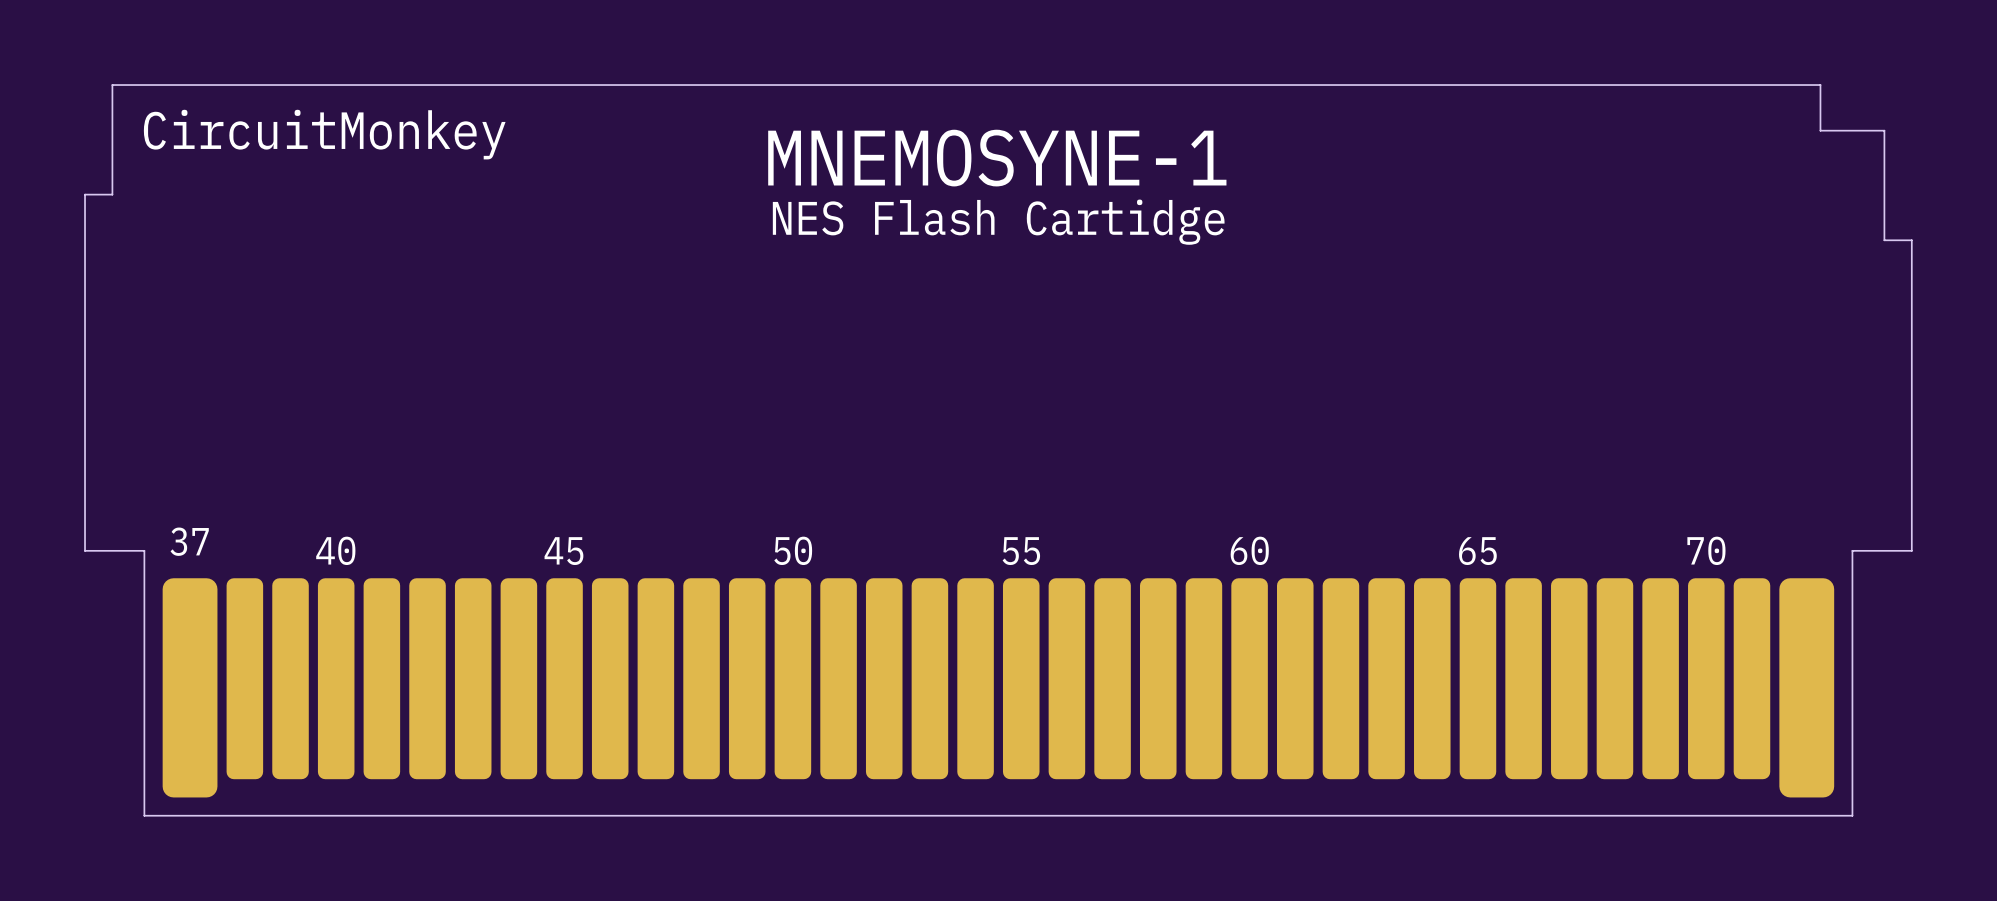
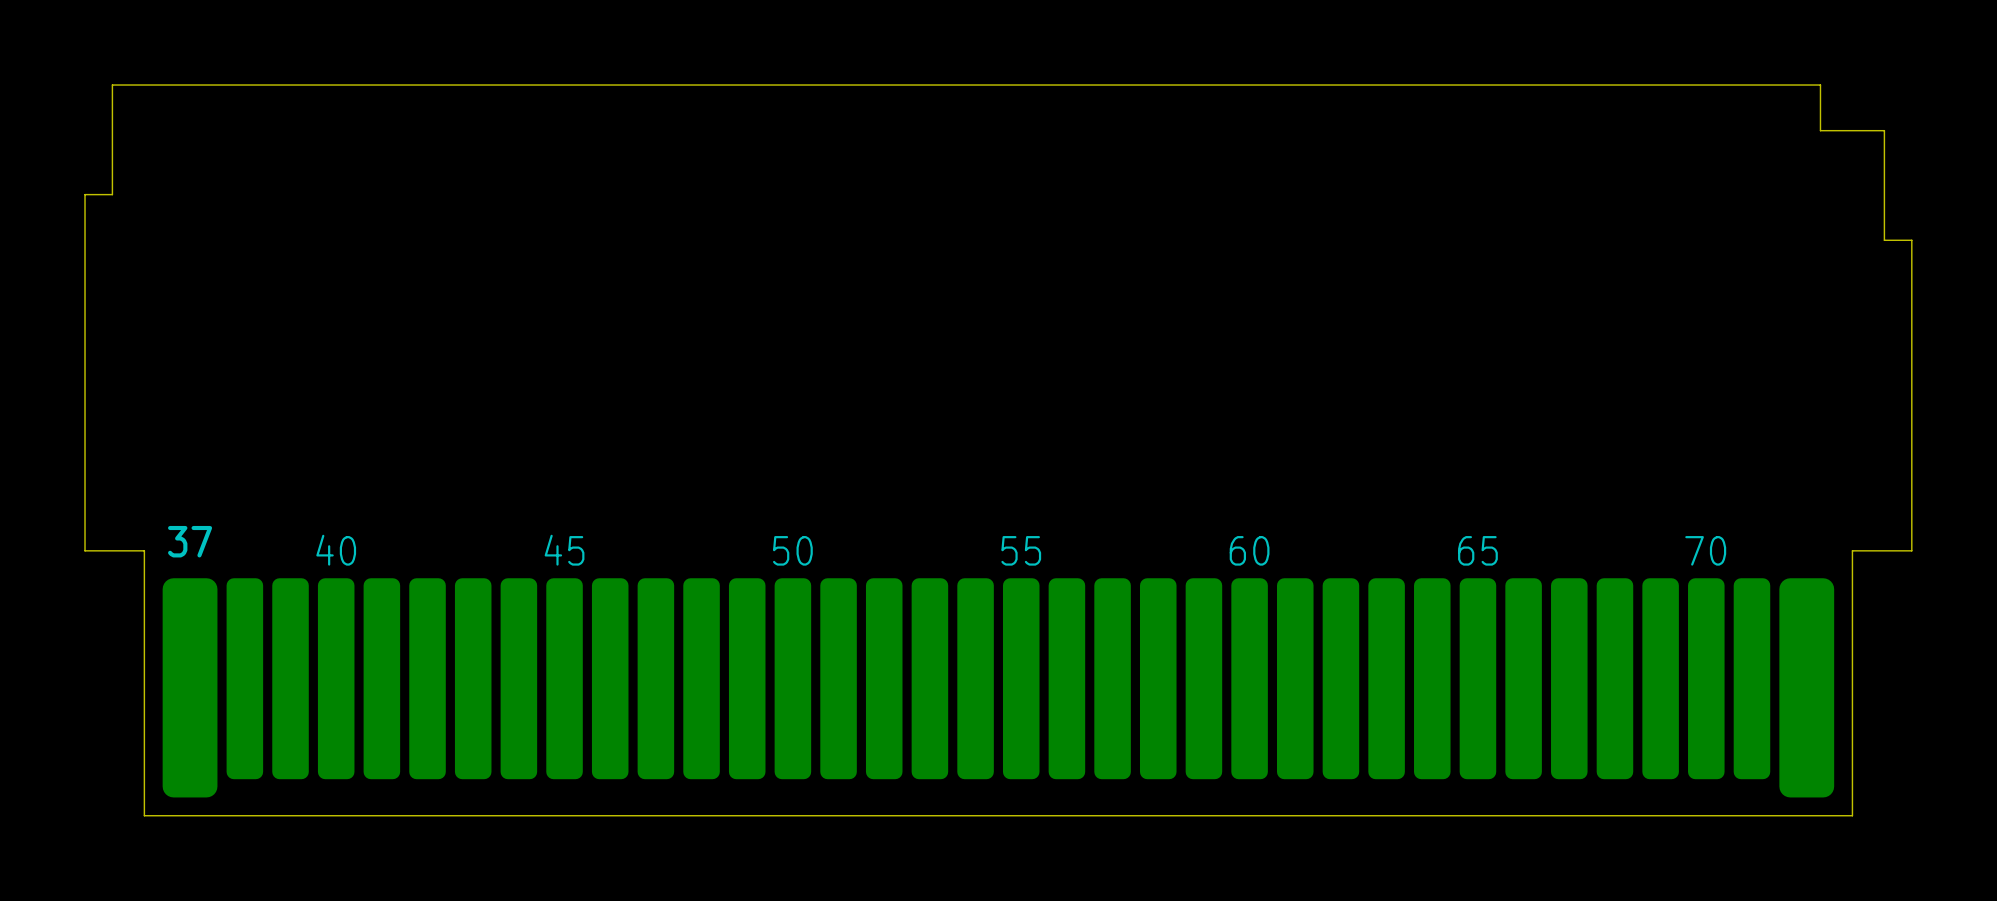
text: CircuitMonkey (324, 134) -> none
text: MNEMOSYNE-1 (997, 158) -> none
text: NES Flash Cartidge (998, 222) -> none

